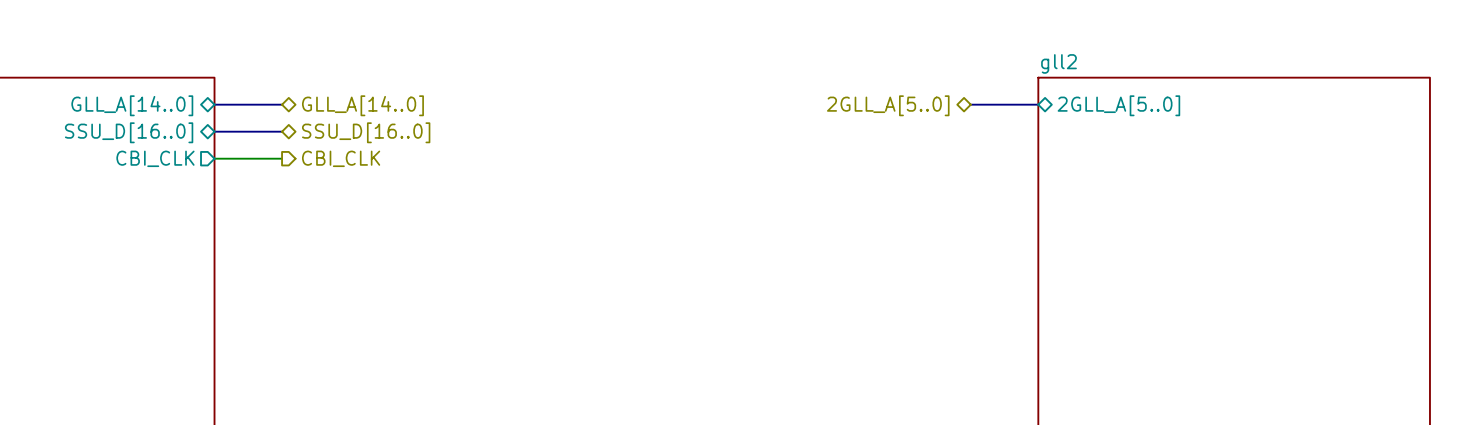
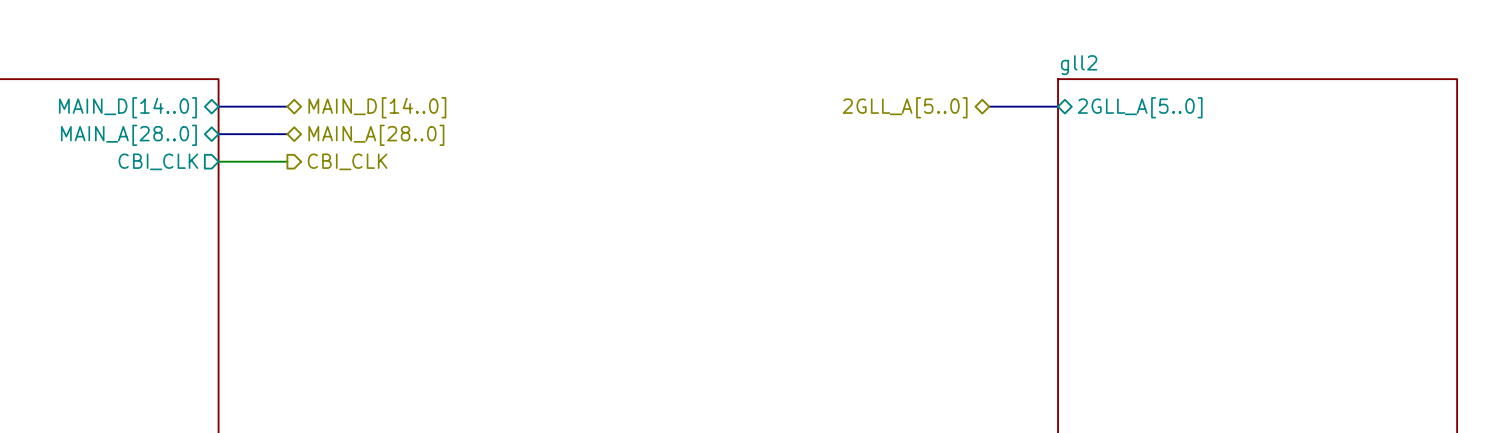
sheet pin: GLL_A[14..0] (132, 105) -> MAIN_D[14..0] (127, 107)
hierarchical label: GLL_A[14..0] (362, 105) -> MAIN_D[14..0] (377, 107)
sheet pin: SSU_D[16..0] (129, 132) -> MAIN_A[28..0] (128, 135)
hierarchical label: SSU_D[16..0] (366, 132) -> MAIN_A[28..0] (376, 135)

